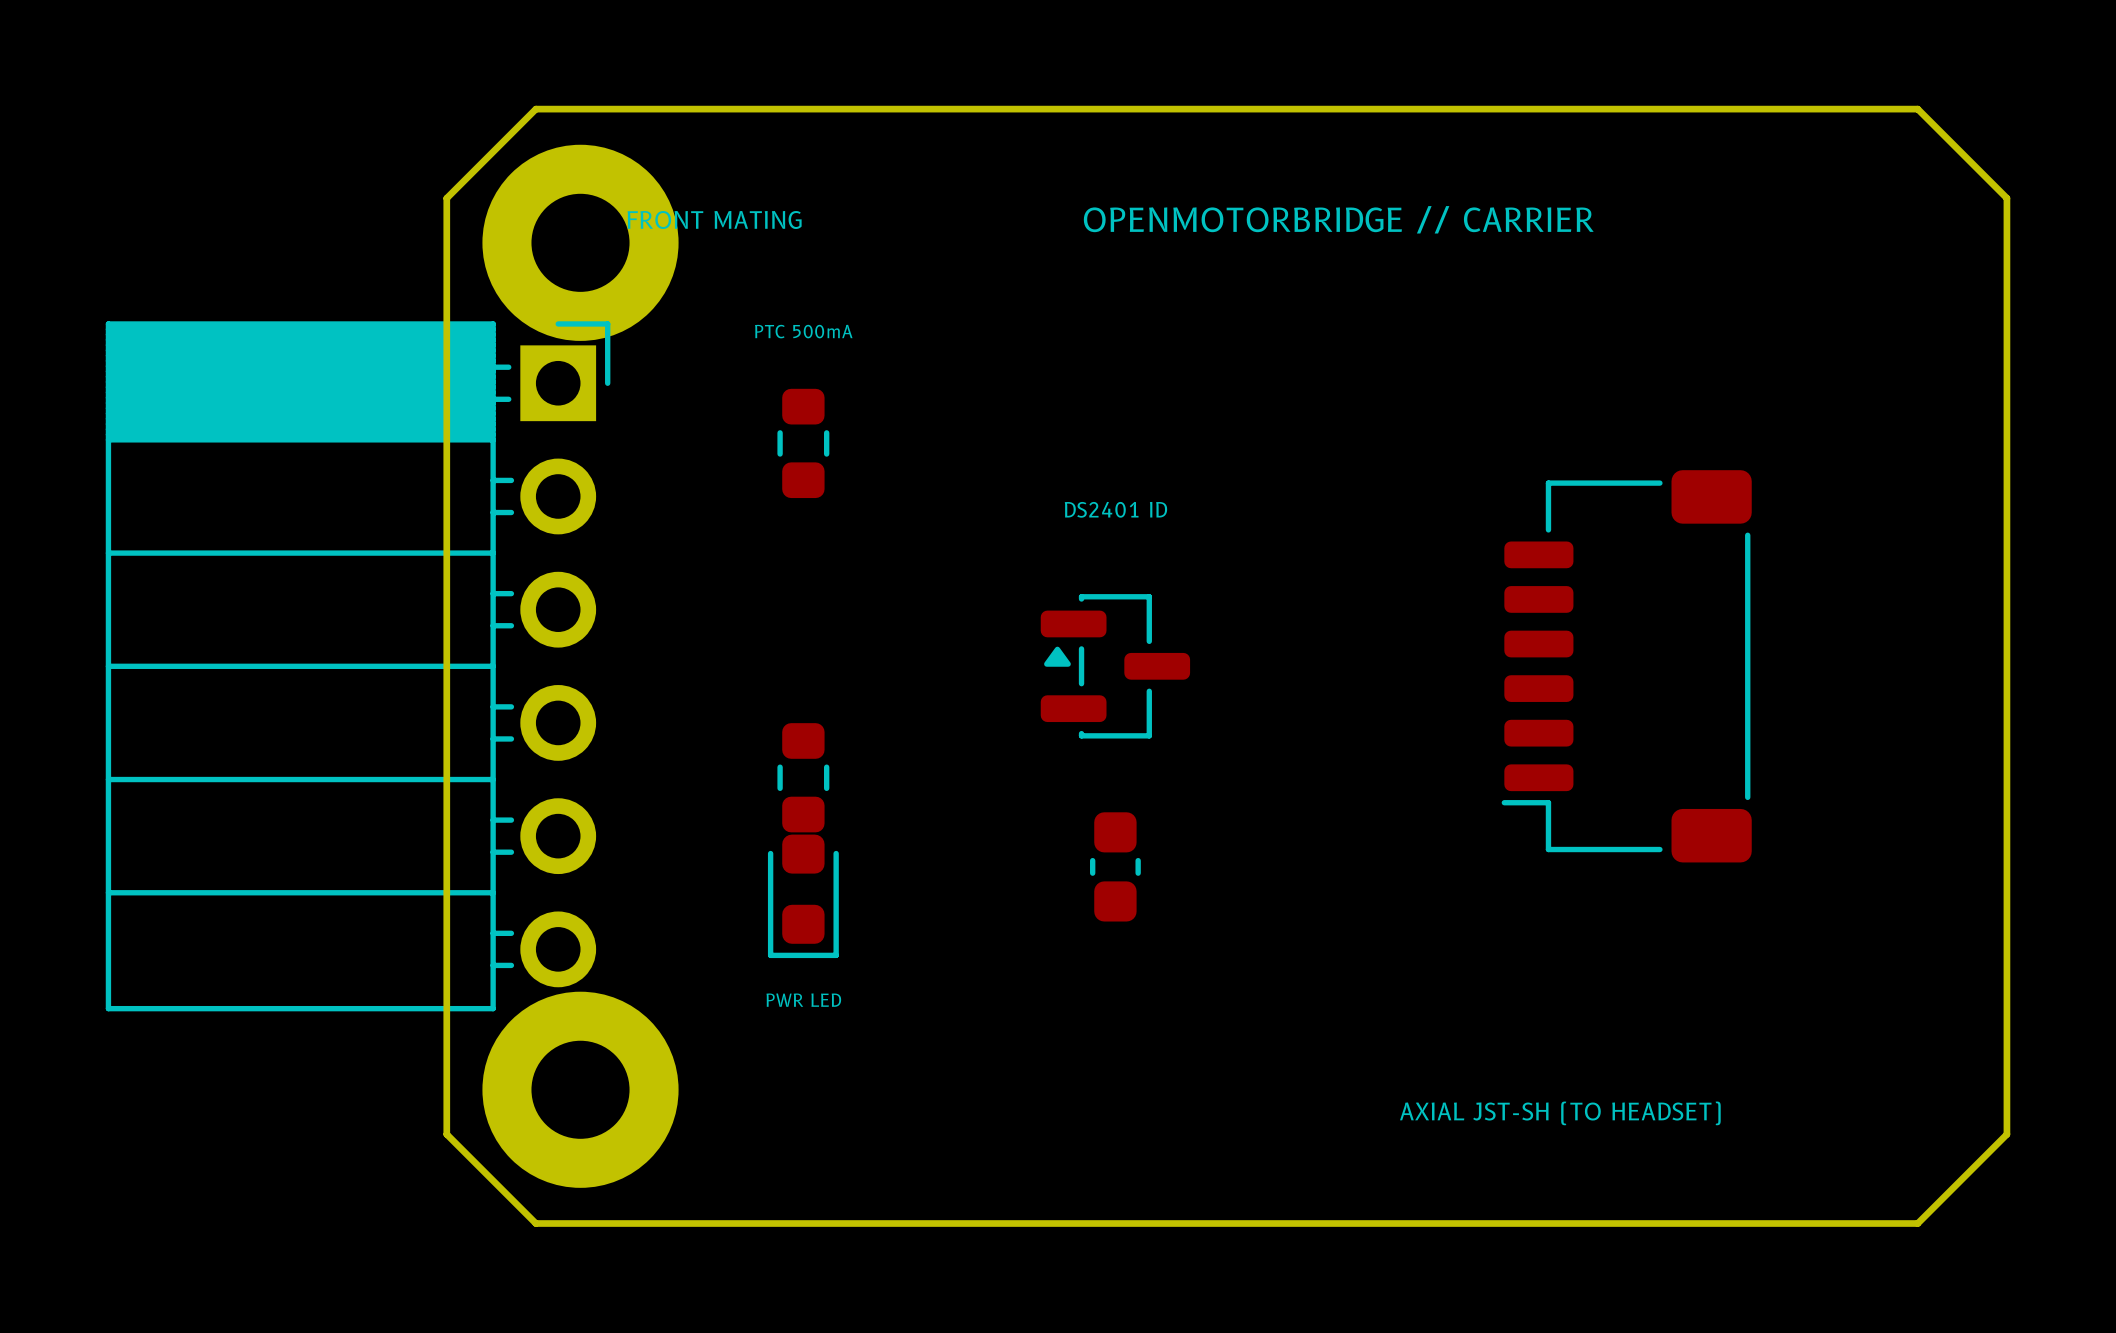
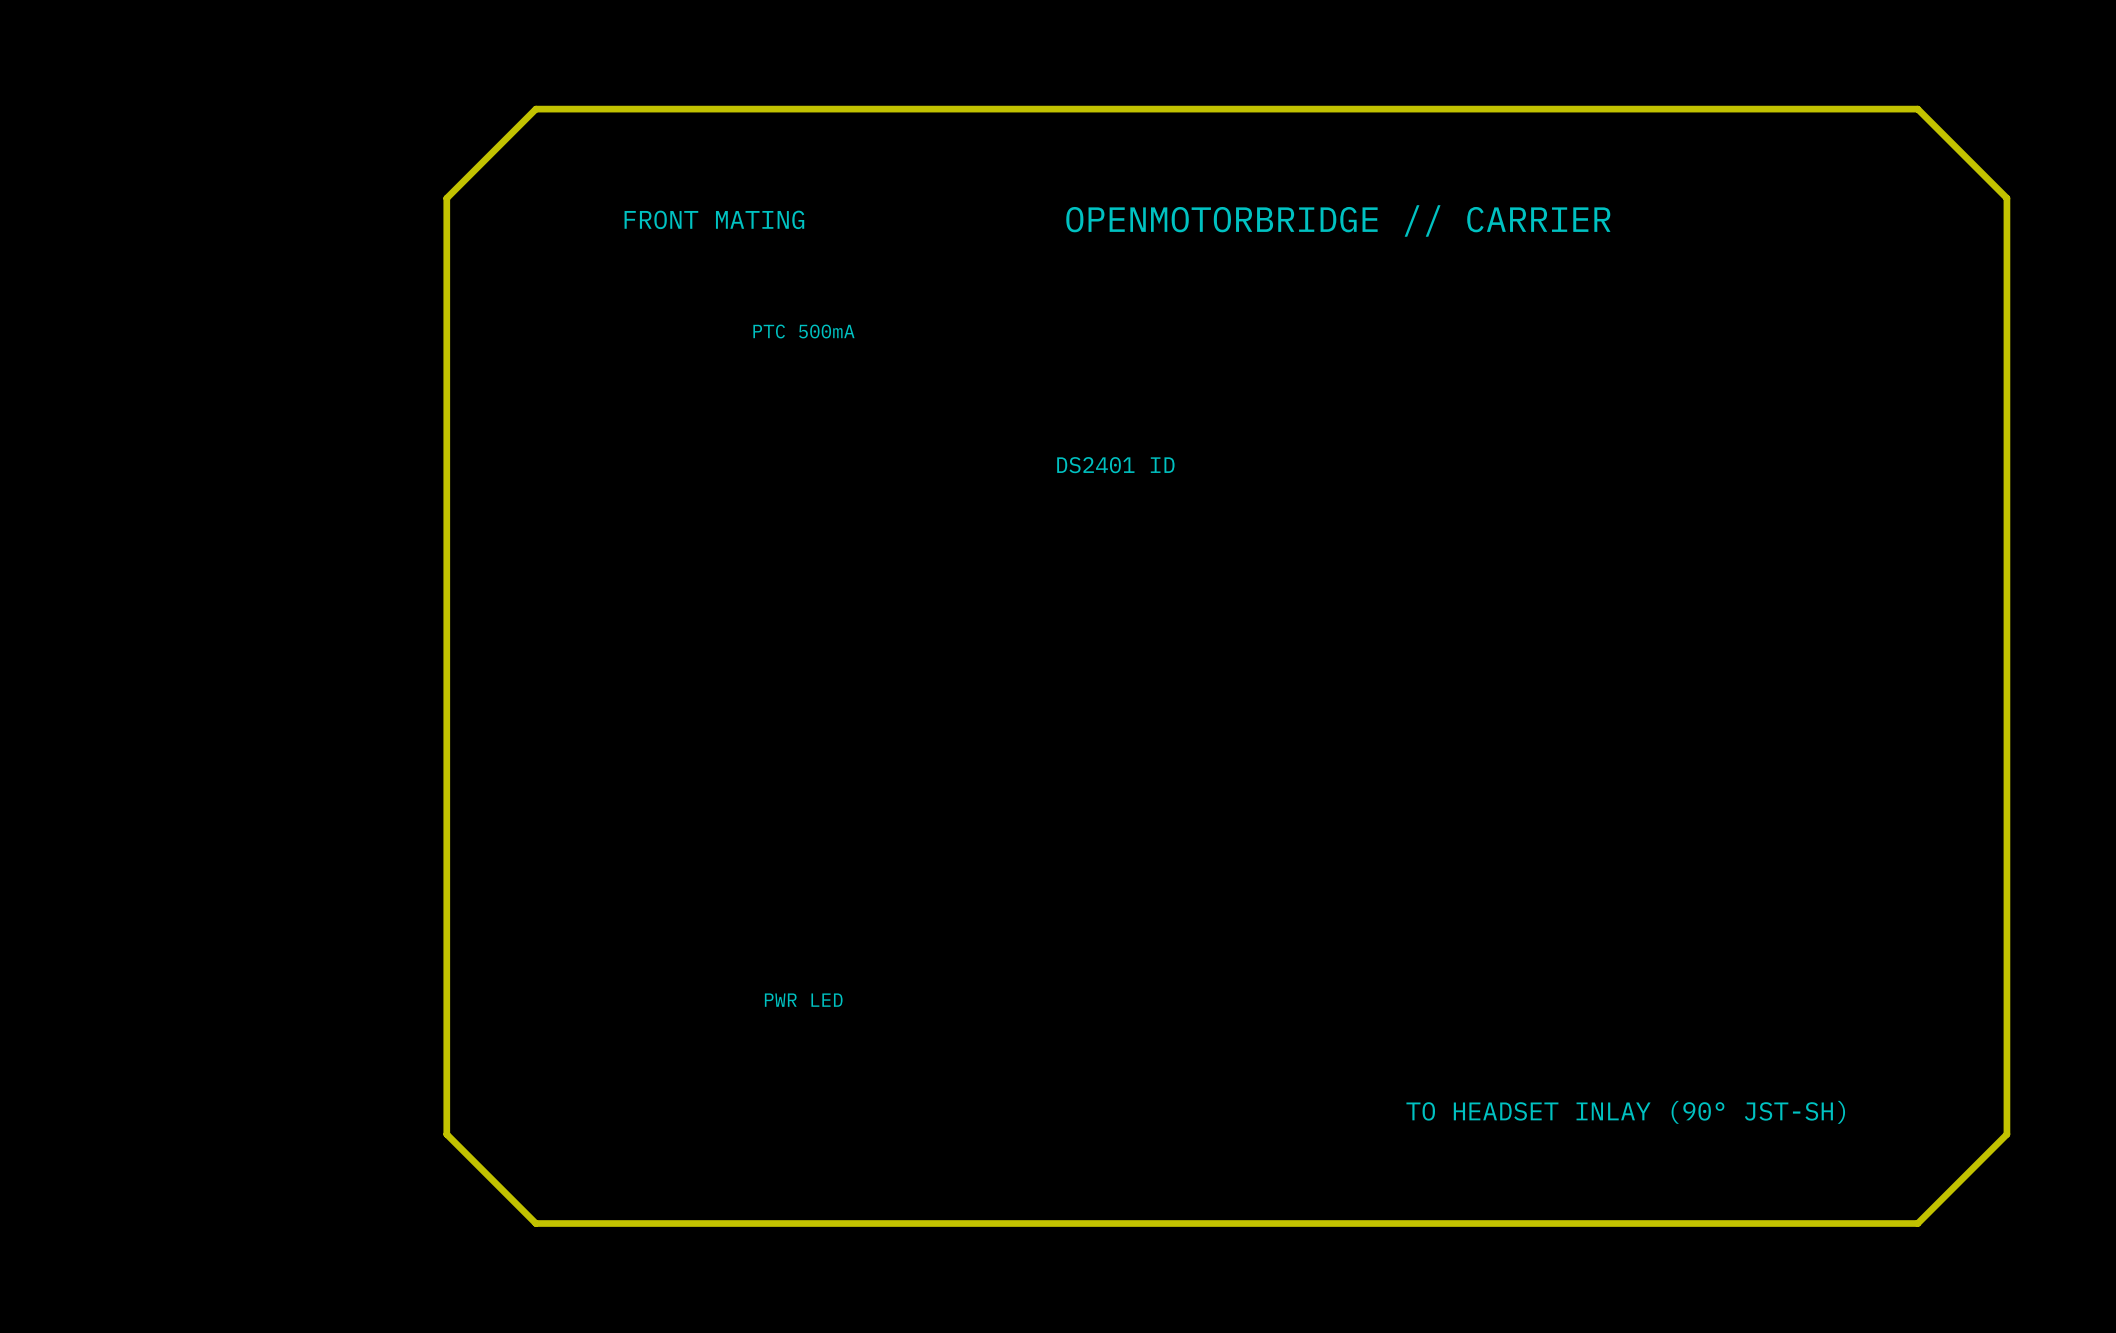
part: (580, 242) -> none
part: (803, 443) -> none
text position: DS2401 ID (1115, 509) -> DS2401 ID (1115, 465)
part: (358, 666) -> none
part: (1115, 666) -> none
part: (1626, 666) -> none
part: (803, 777) -> none
part: (1115, 866) -> none
part: (803, 896) -> none
part: (580, 1089) -> none
text: AXIAL JST-SH (TO HEADSET) (1560, 1113) -> none
text: none -> TO HEADSET INLAY (90° JST-SH) (1625, 1112)

